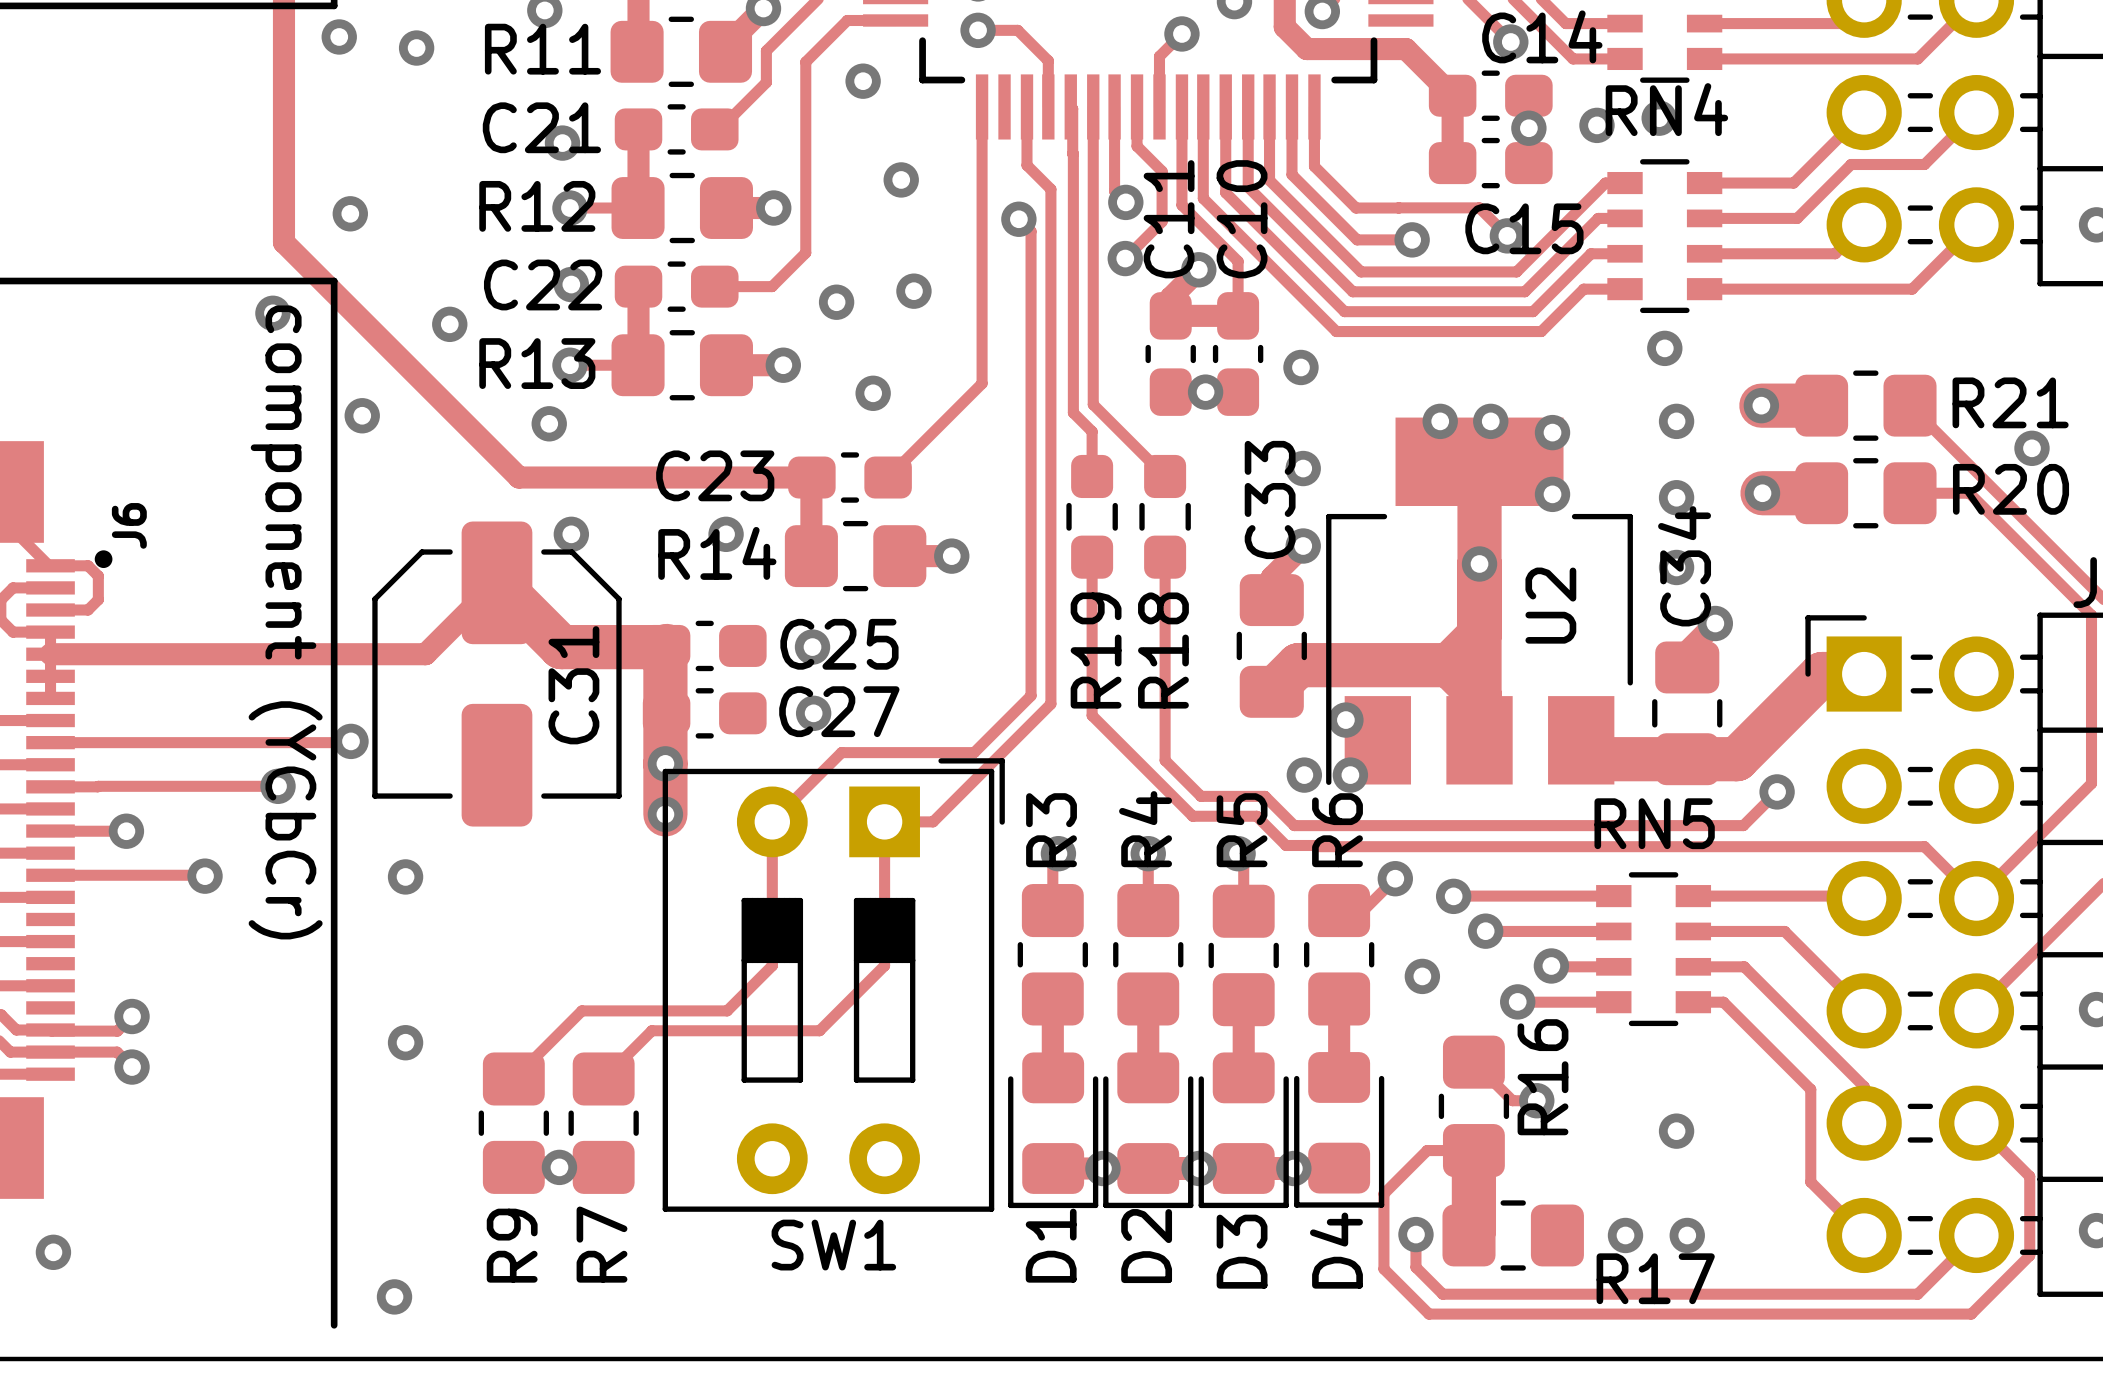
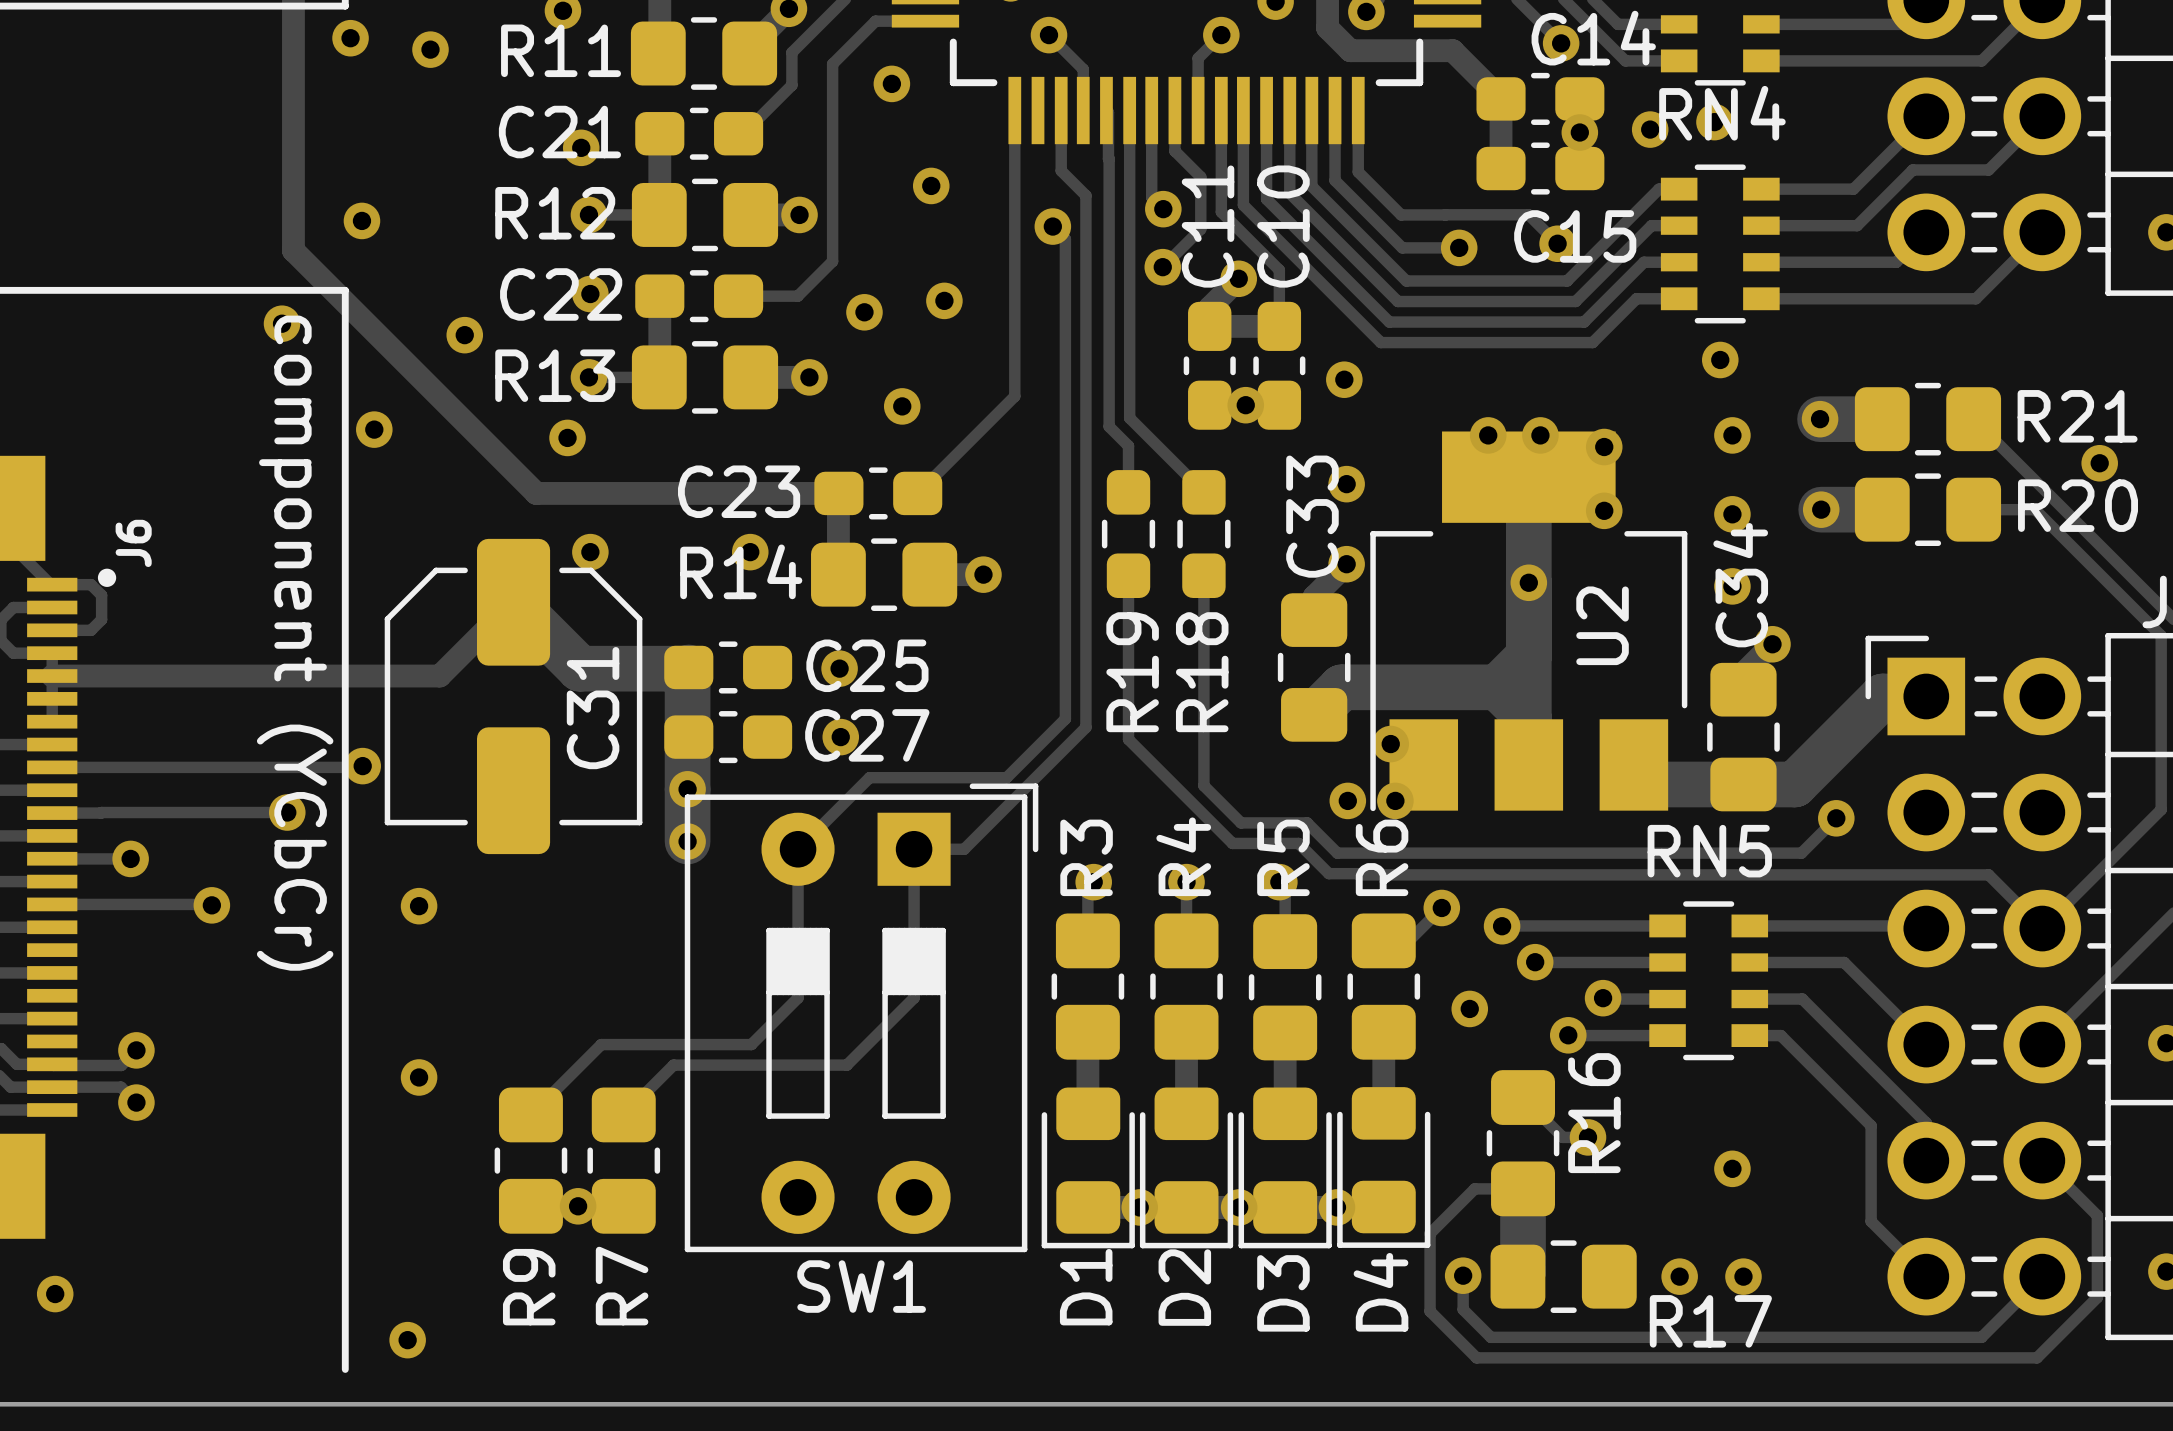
track: (978, 30) (1017, 30) (1048, 60) (1048, 67) -> (1049, 35) (1083, 69)
via position: (978, 30) -> (1049, 35)

